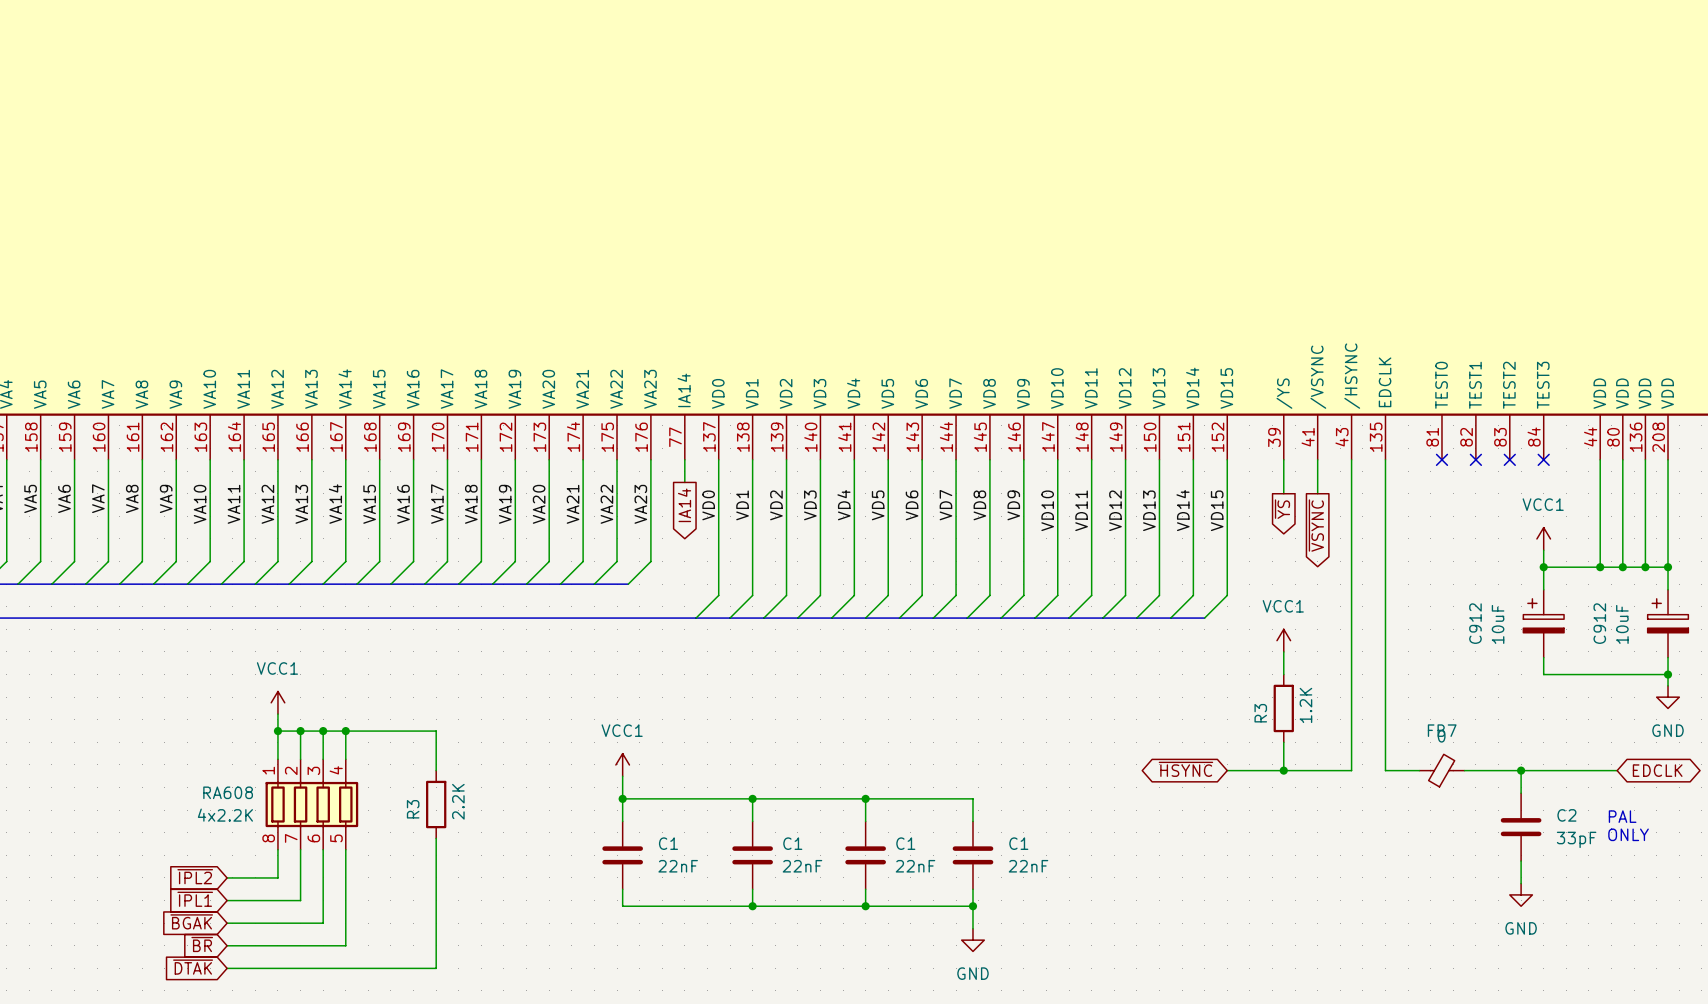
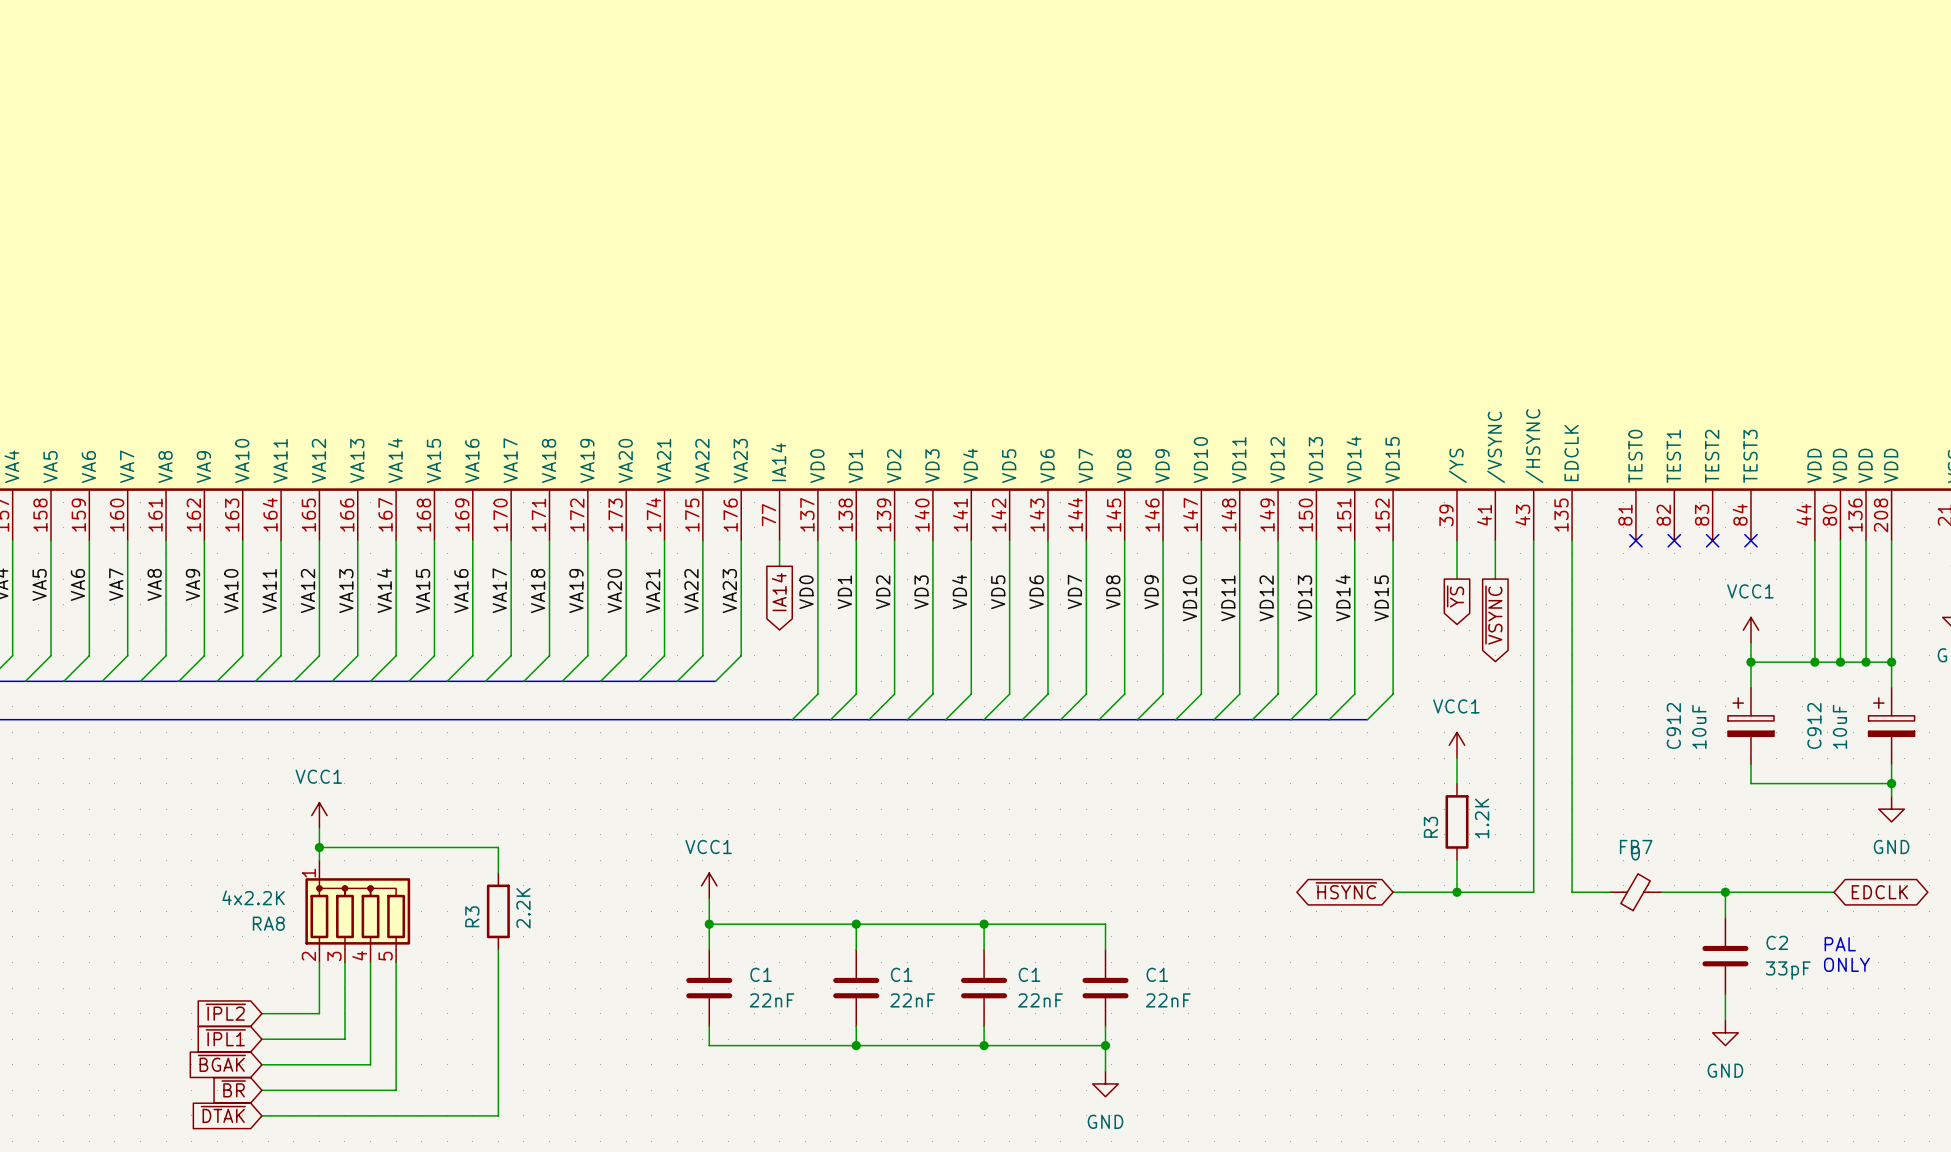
wire: (300, 731) (300, 759) -> none
junction: (300, 731) -> none
wire: (323, 731) (323, 759) -> none
junction: (323, 731) -> none
wire: (345, 731) (345, 759) -> none
junction: (345, 731) -> none
RA8: none -> 4x2.2K (357, 911)
RA608: 4x2.2K (311, 804) -> none
R3 position: (436, 804) -> (498, 911)

